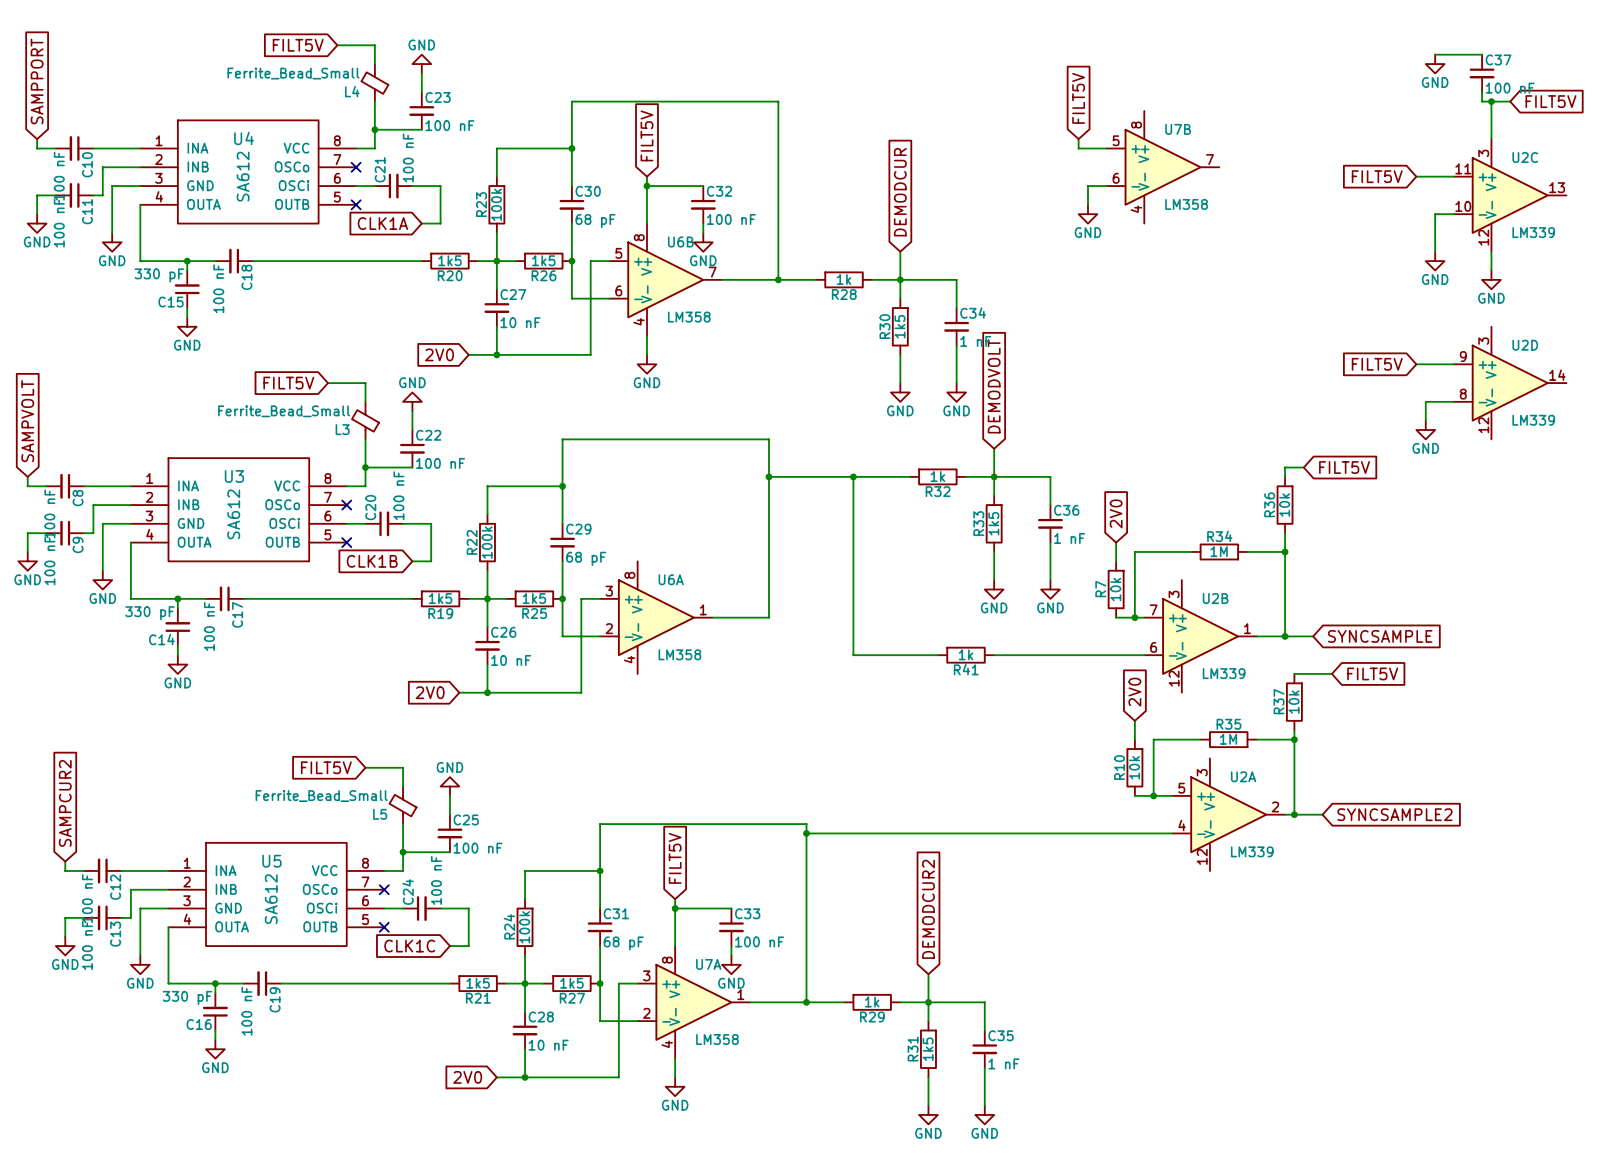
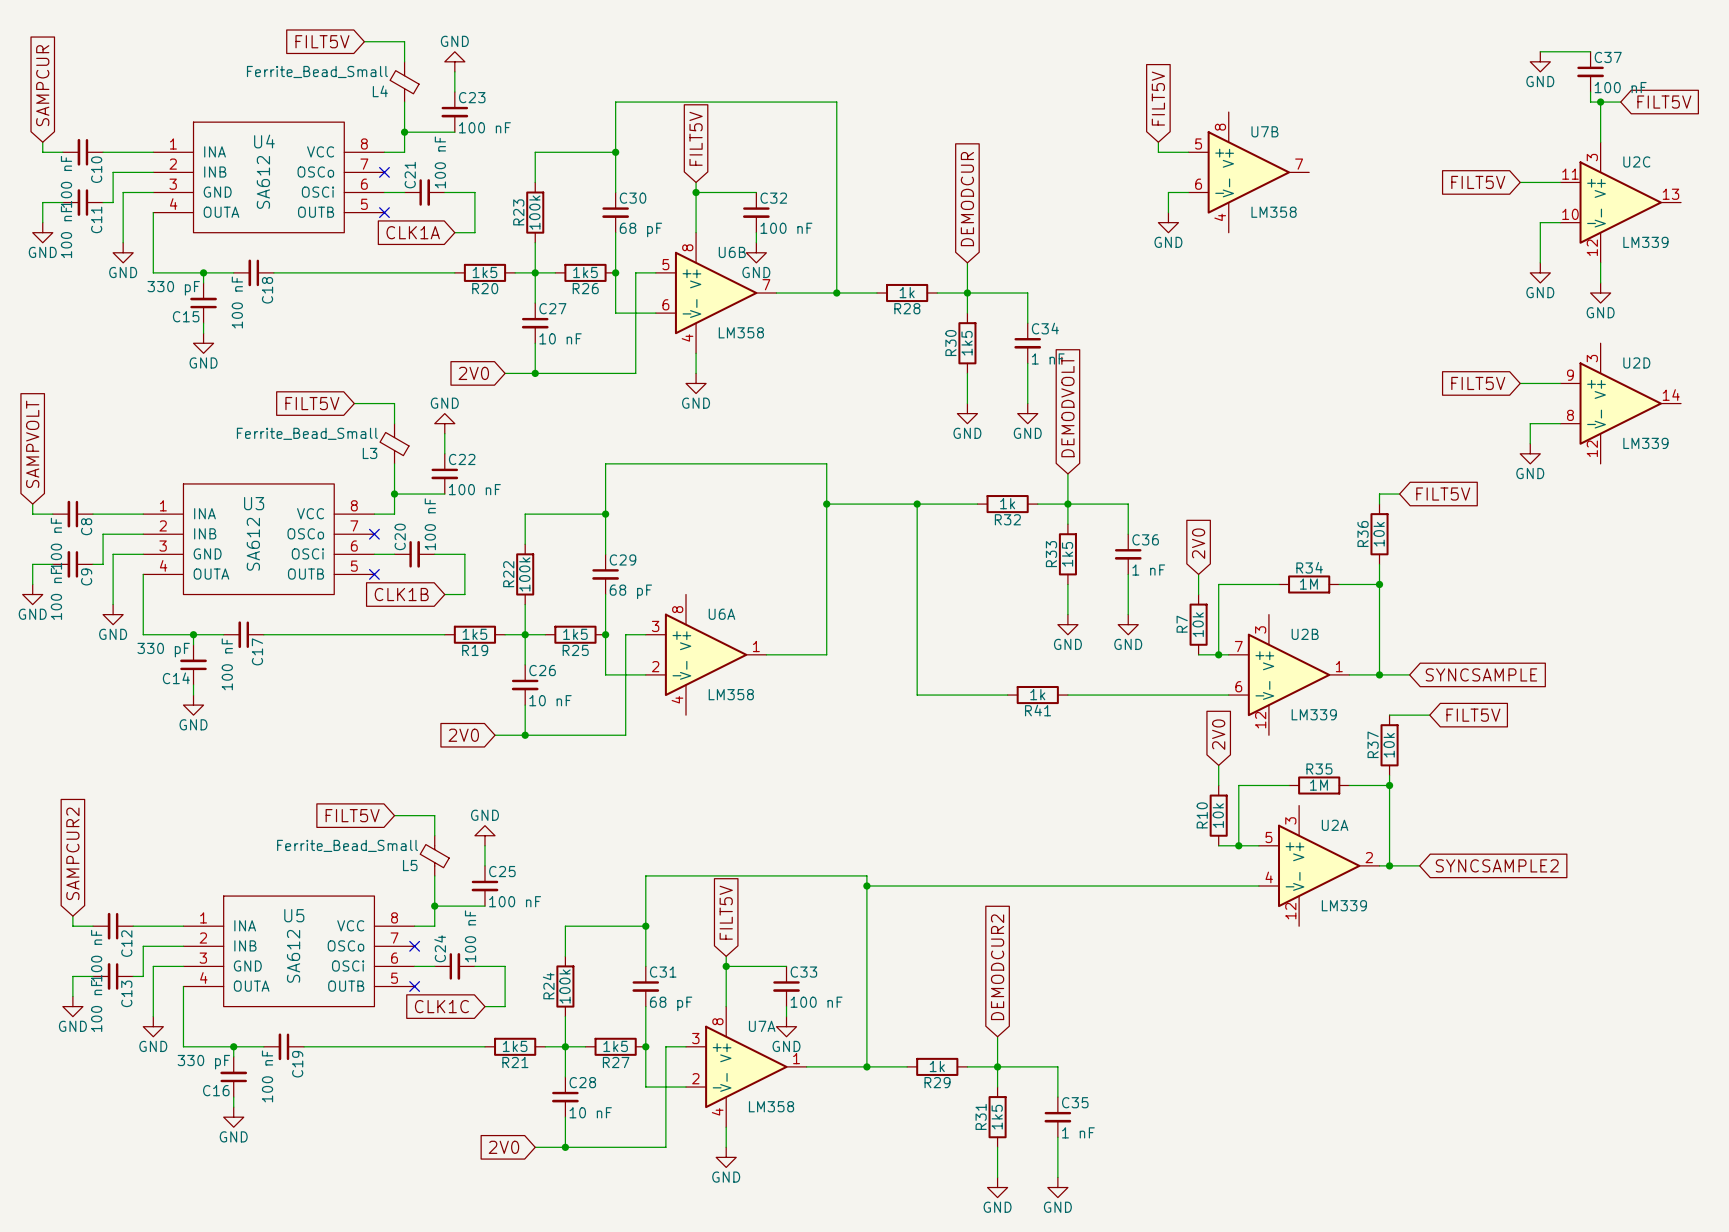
global label: SAMPPORT (37, 81) -> SAMPCUR (42, 85)

